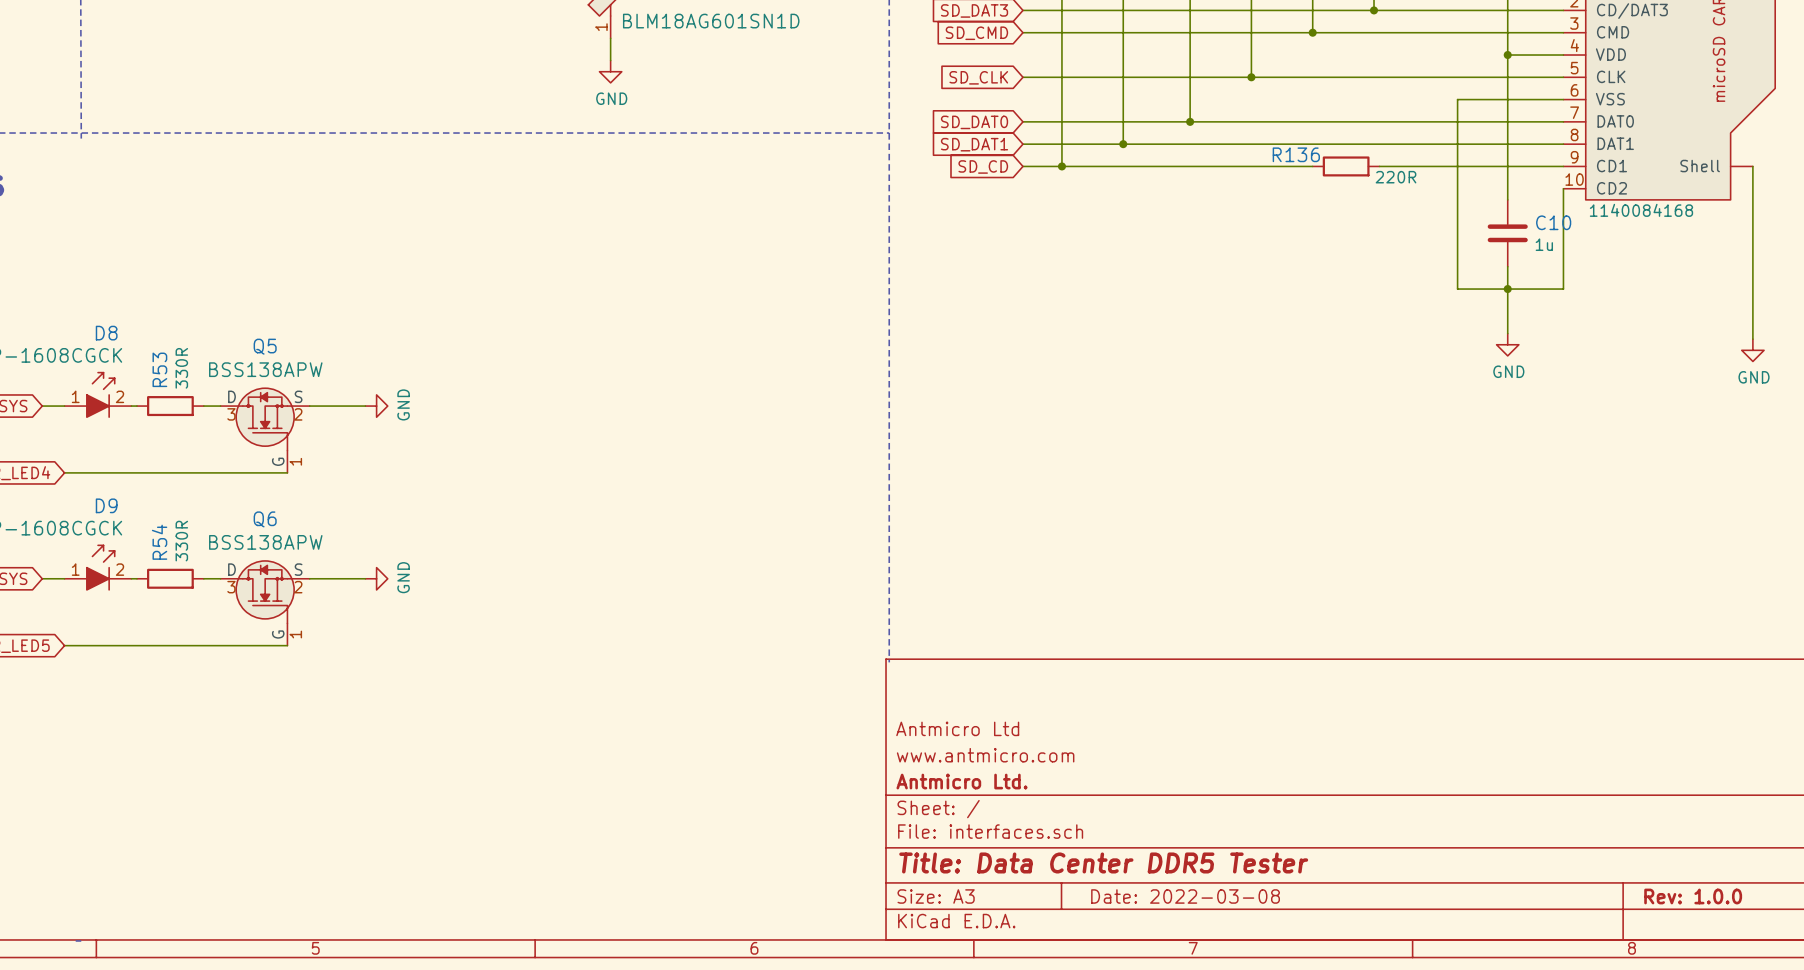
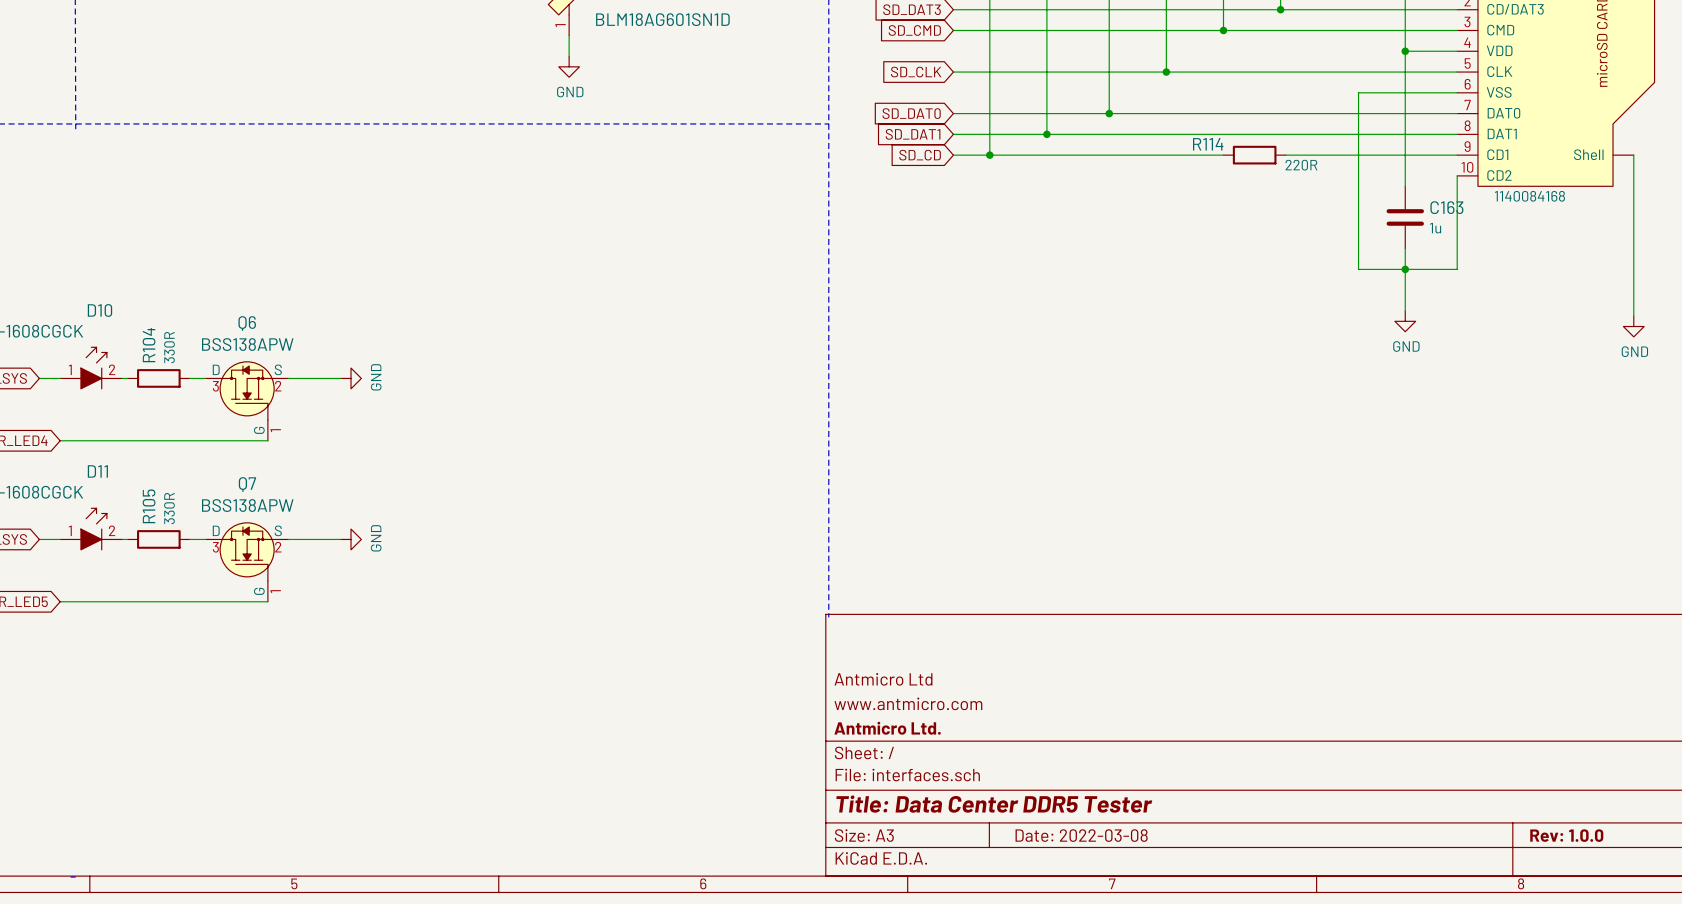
R136 name: R136 (1296, 154) -> R114 (1208, 144)
C10 name: C10 (1553, 222) -> C163 (1446, 207)
D8 name: D8 (106, 333) -> D10 (99, 310)
Q5 name: Q5 (265, 346) -> Q6 (247, 323)
R53 name: R53 (159, 369) -> R104 (149, 345)
D9 name: D9 (106, 505) -> D11 (97, 471)
Q6 name: Q6 (265, 519) -> Q7 (247, 484)
R54 name: R54 (159, 542) -> R105 (149, 506)

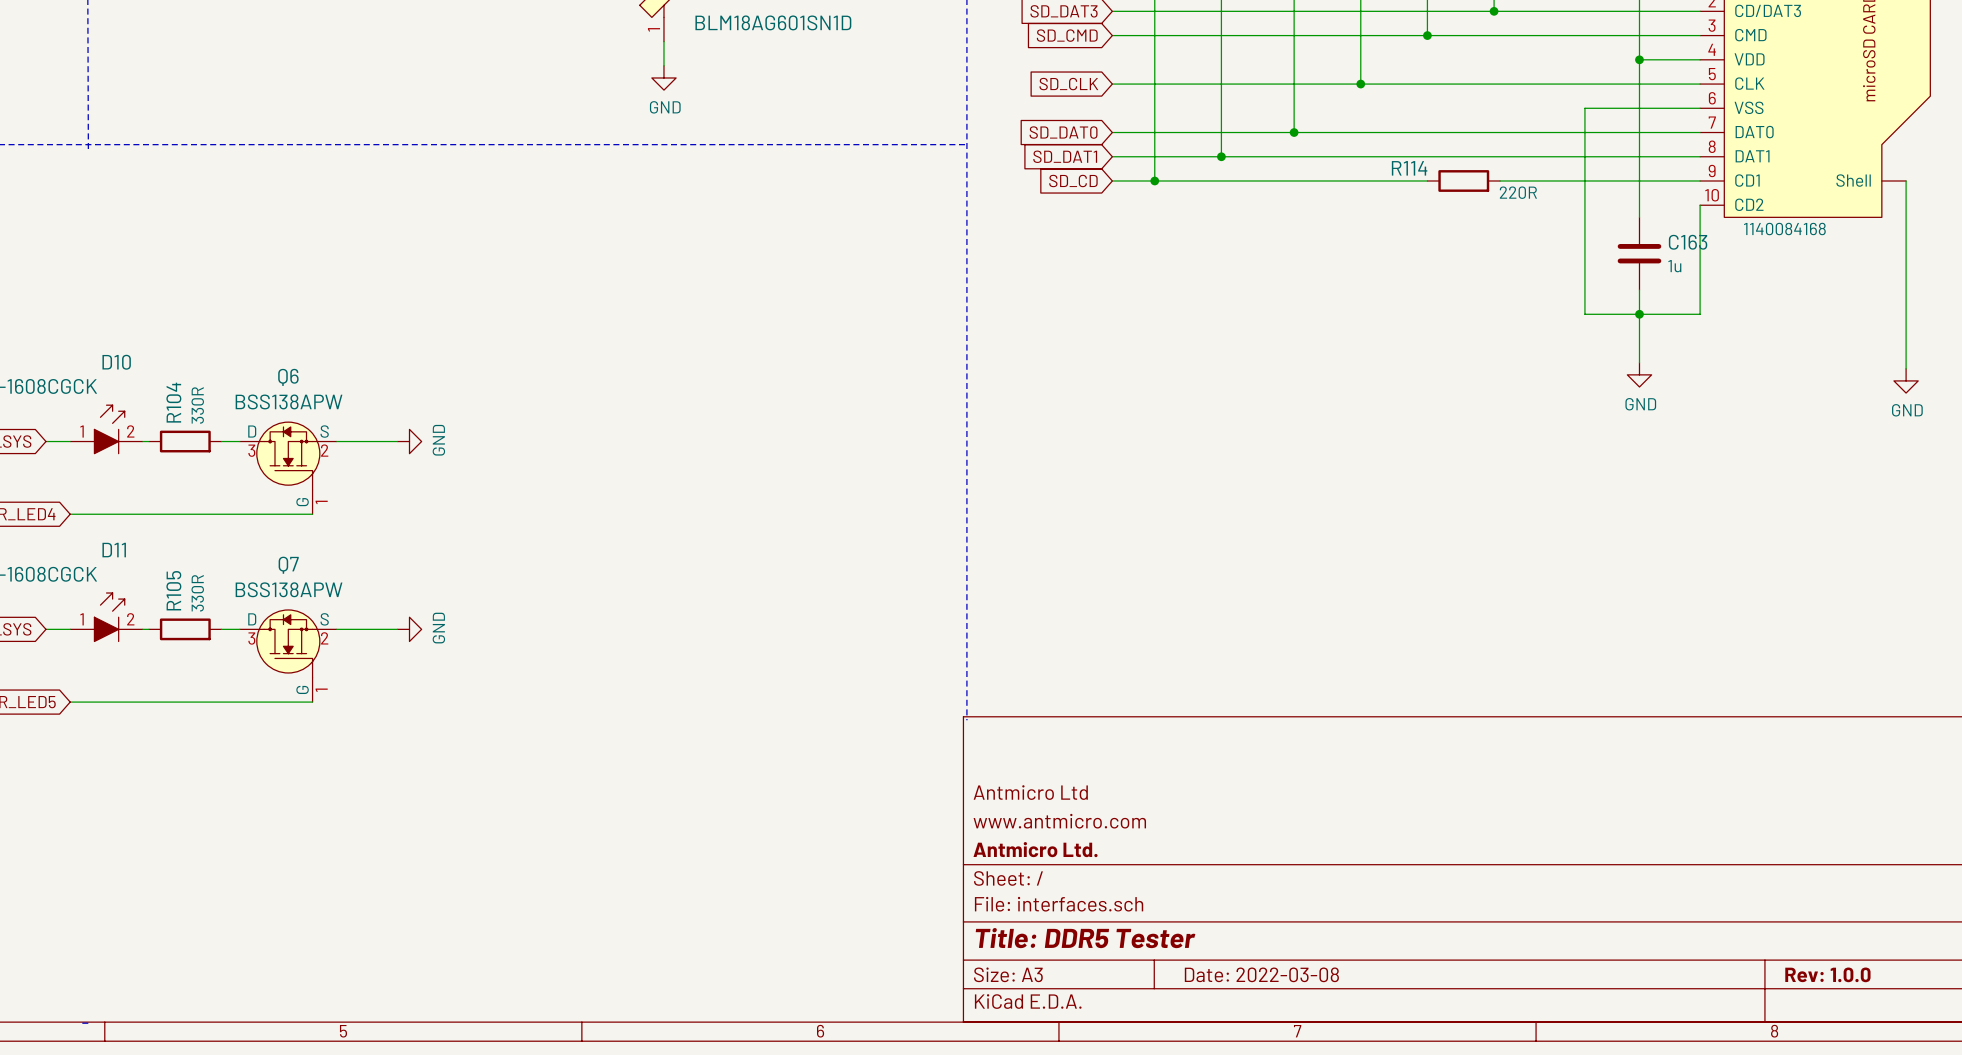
title block: Title: Data Center DDR5 Tester (994, 804) -> Title: DDR5 Tester (1085, 938)

